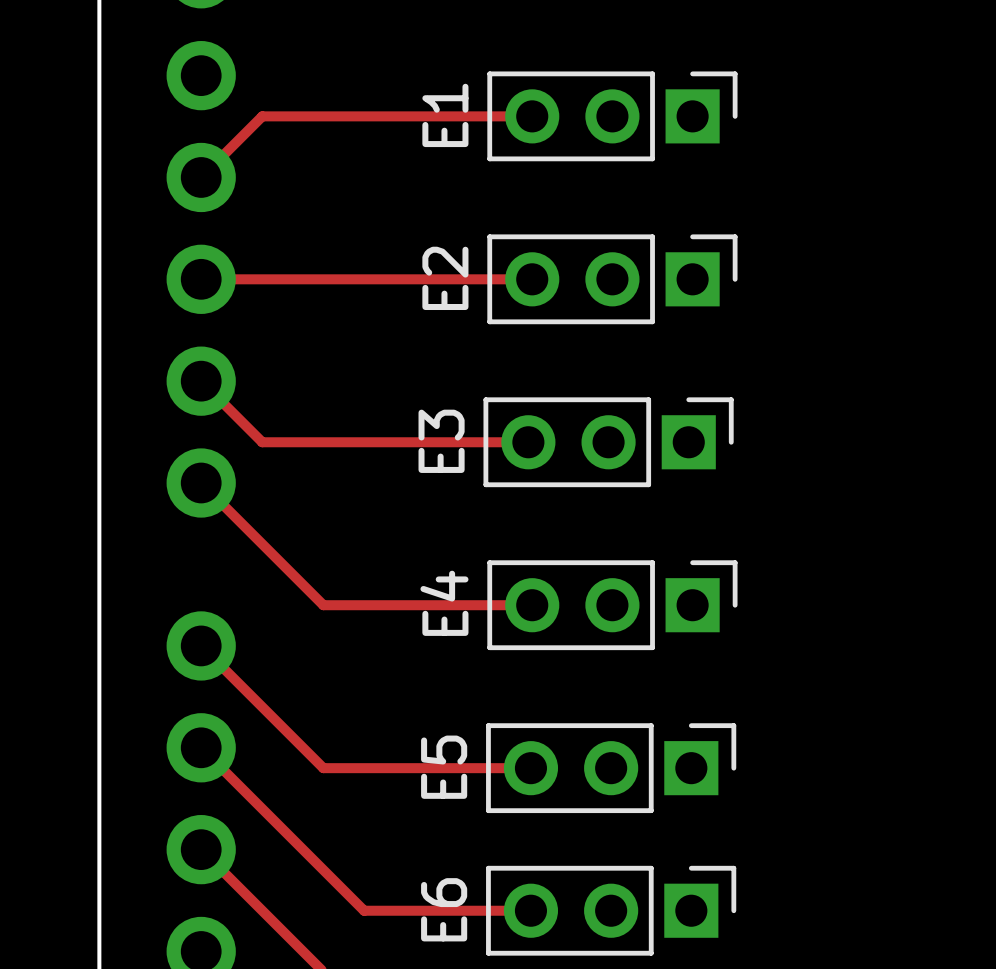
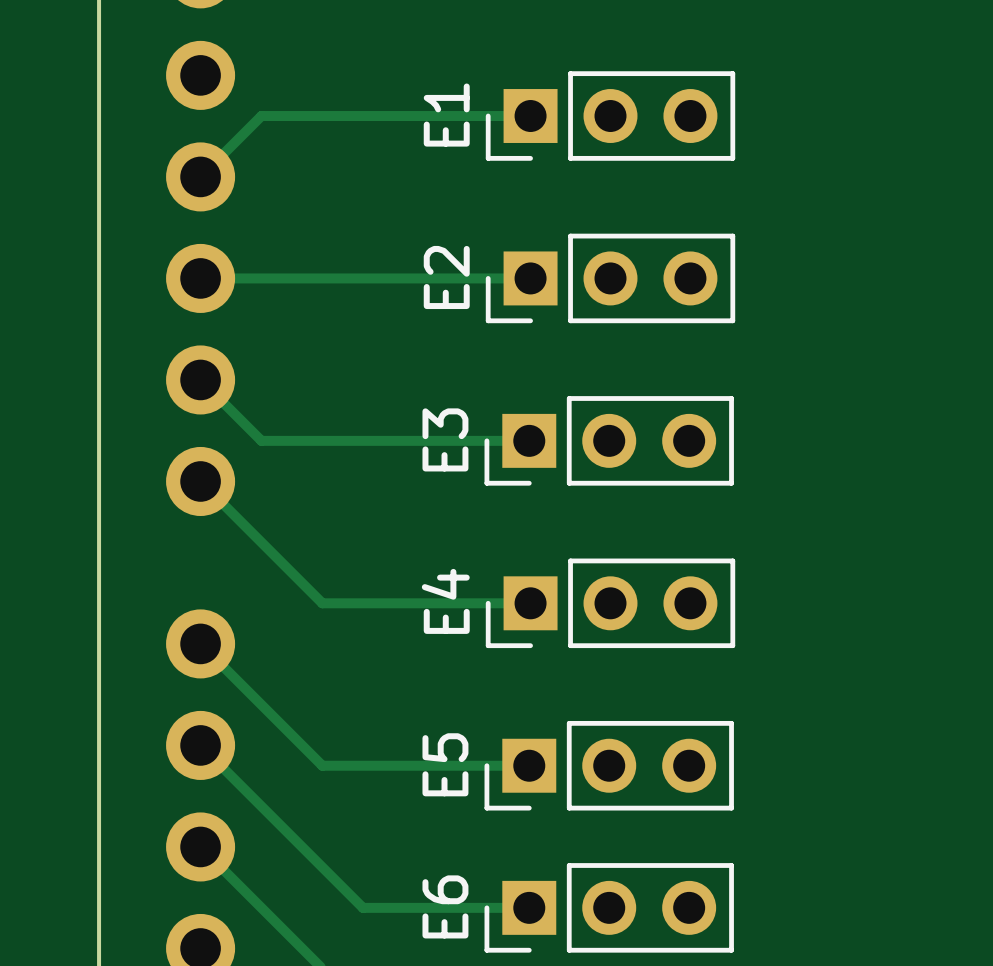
E1 rotation: 0° (612, 116) -> 180° (610, 116)
E2 rotation: 0° (612, 279) -> 180° (610, 278)
E3 rotation: 0° (608, 442) -> 180° (609, 440)
E4 rotation: 0° (612, 605) -> 180° (610, 603)
E5 rotation: 0° (611, 768) -> 180° (609, 765)
E6 rotation: 0° (611, 910) -> 180° (609, 907)

